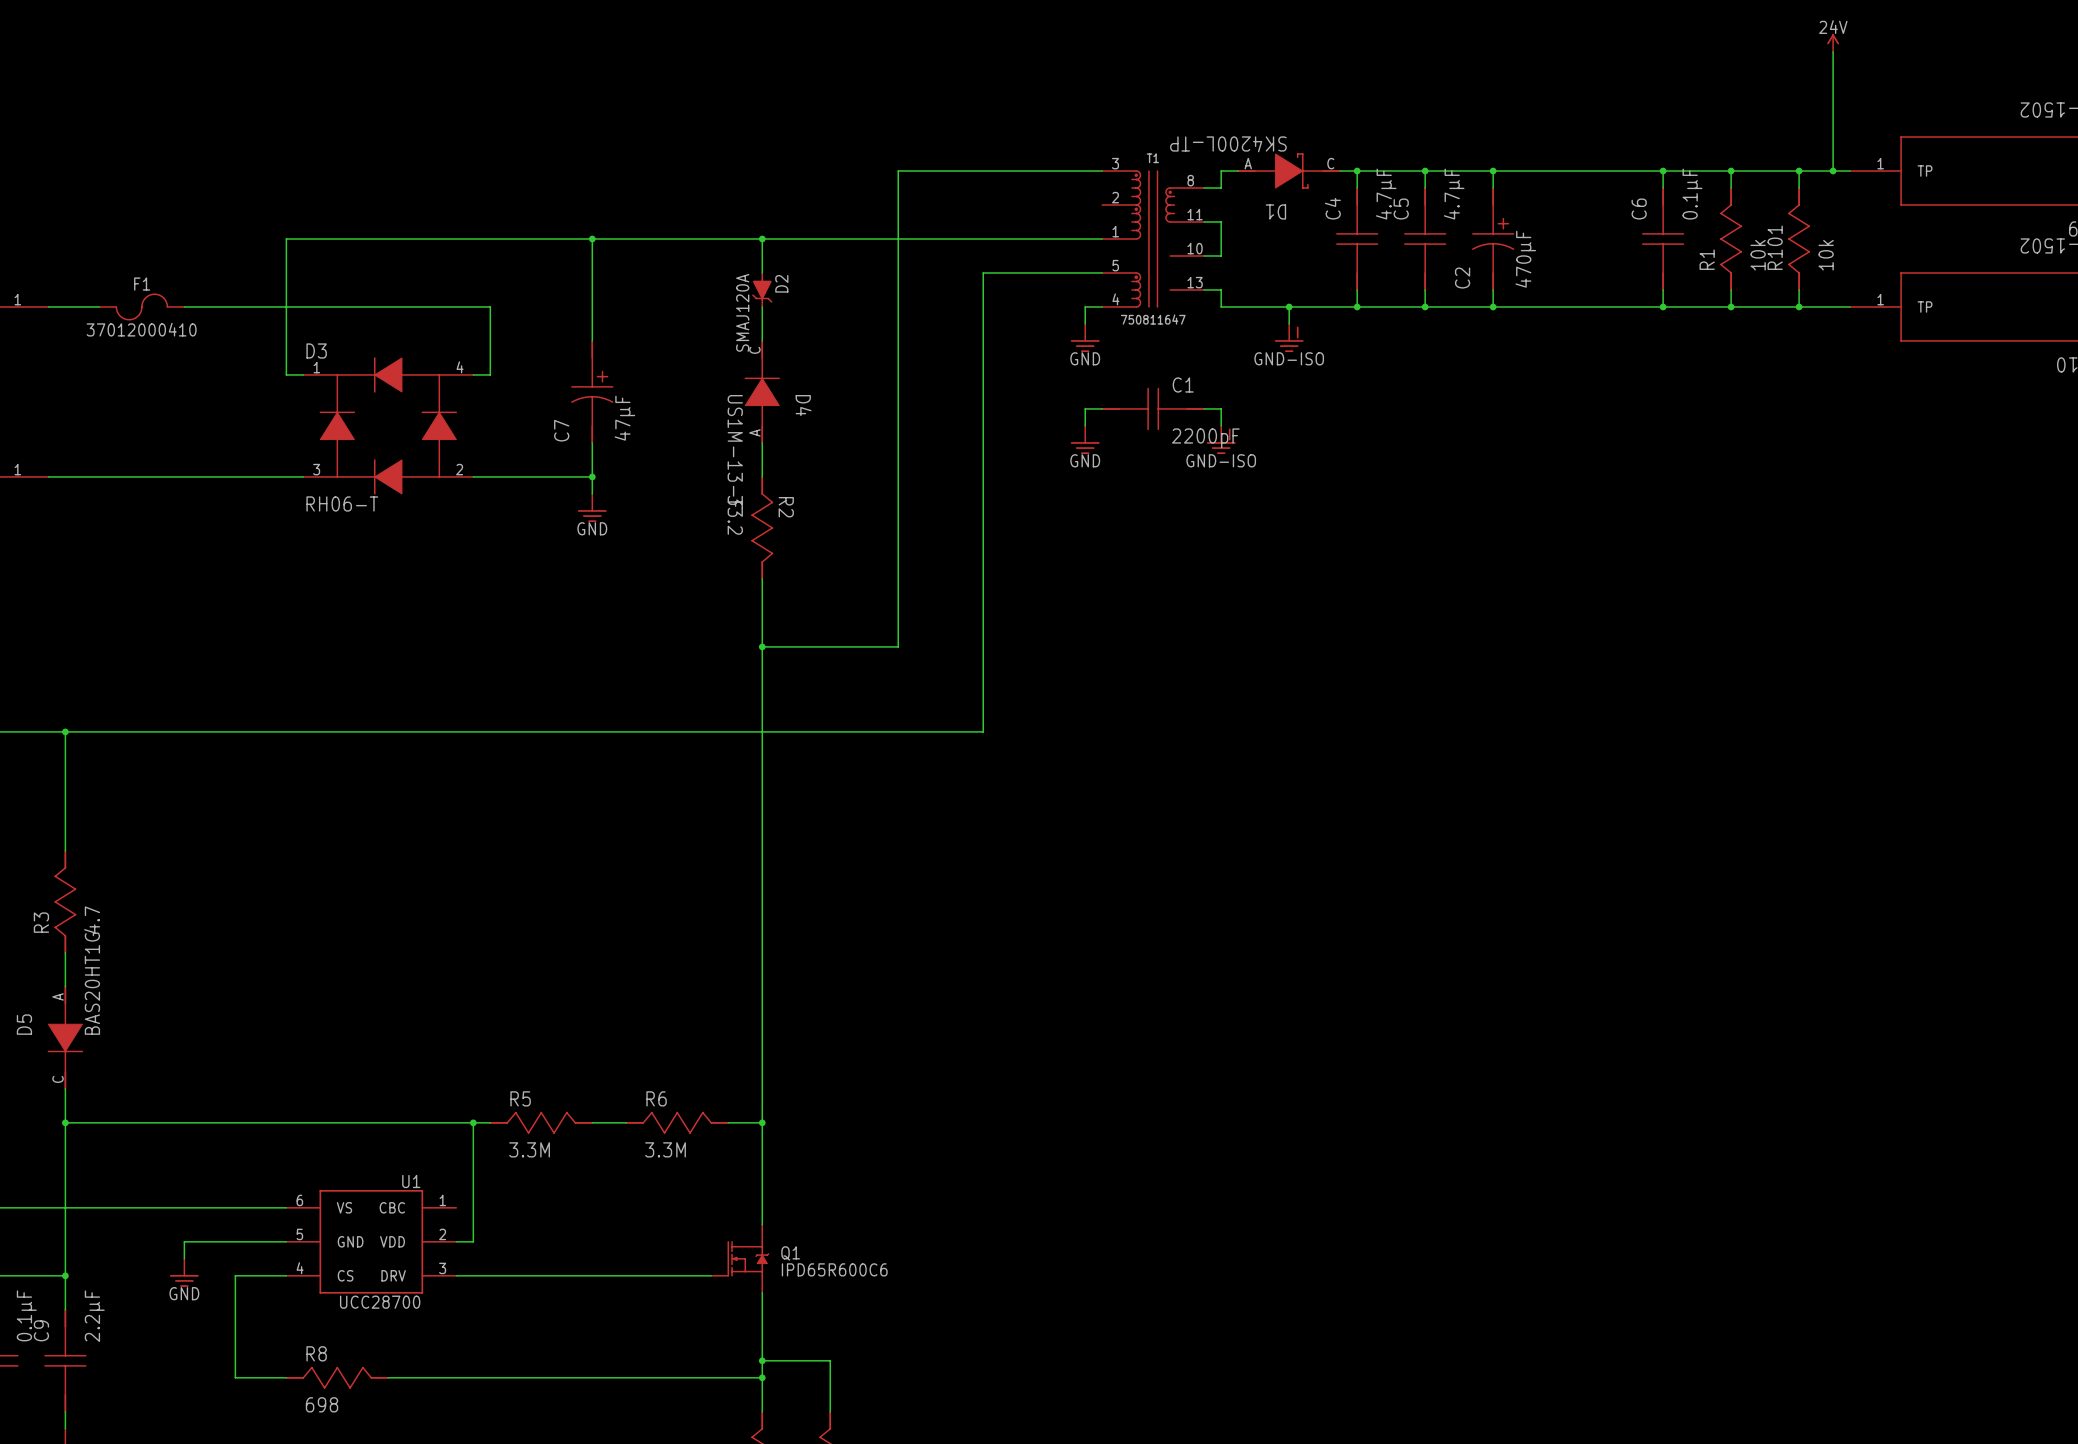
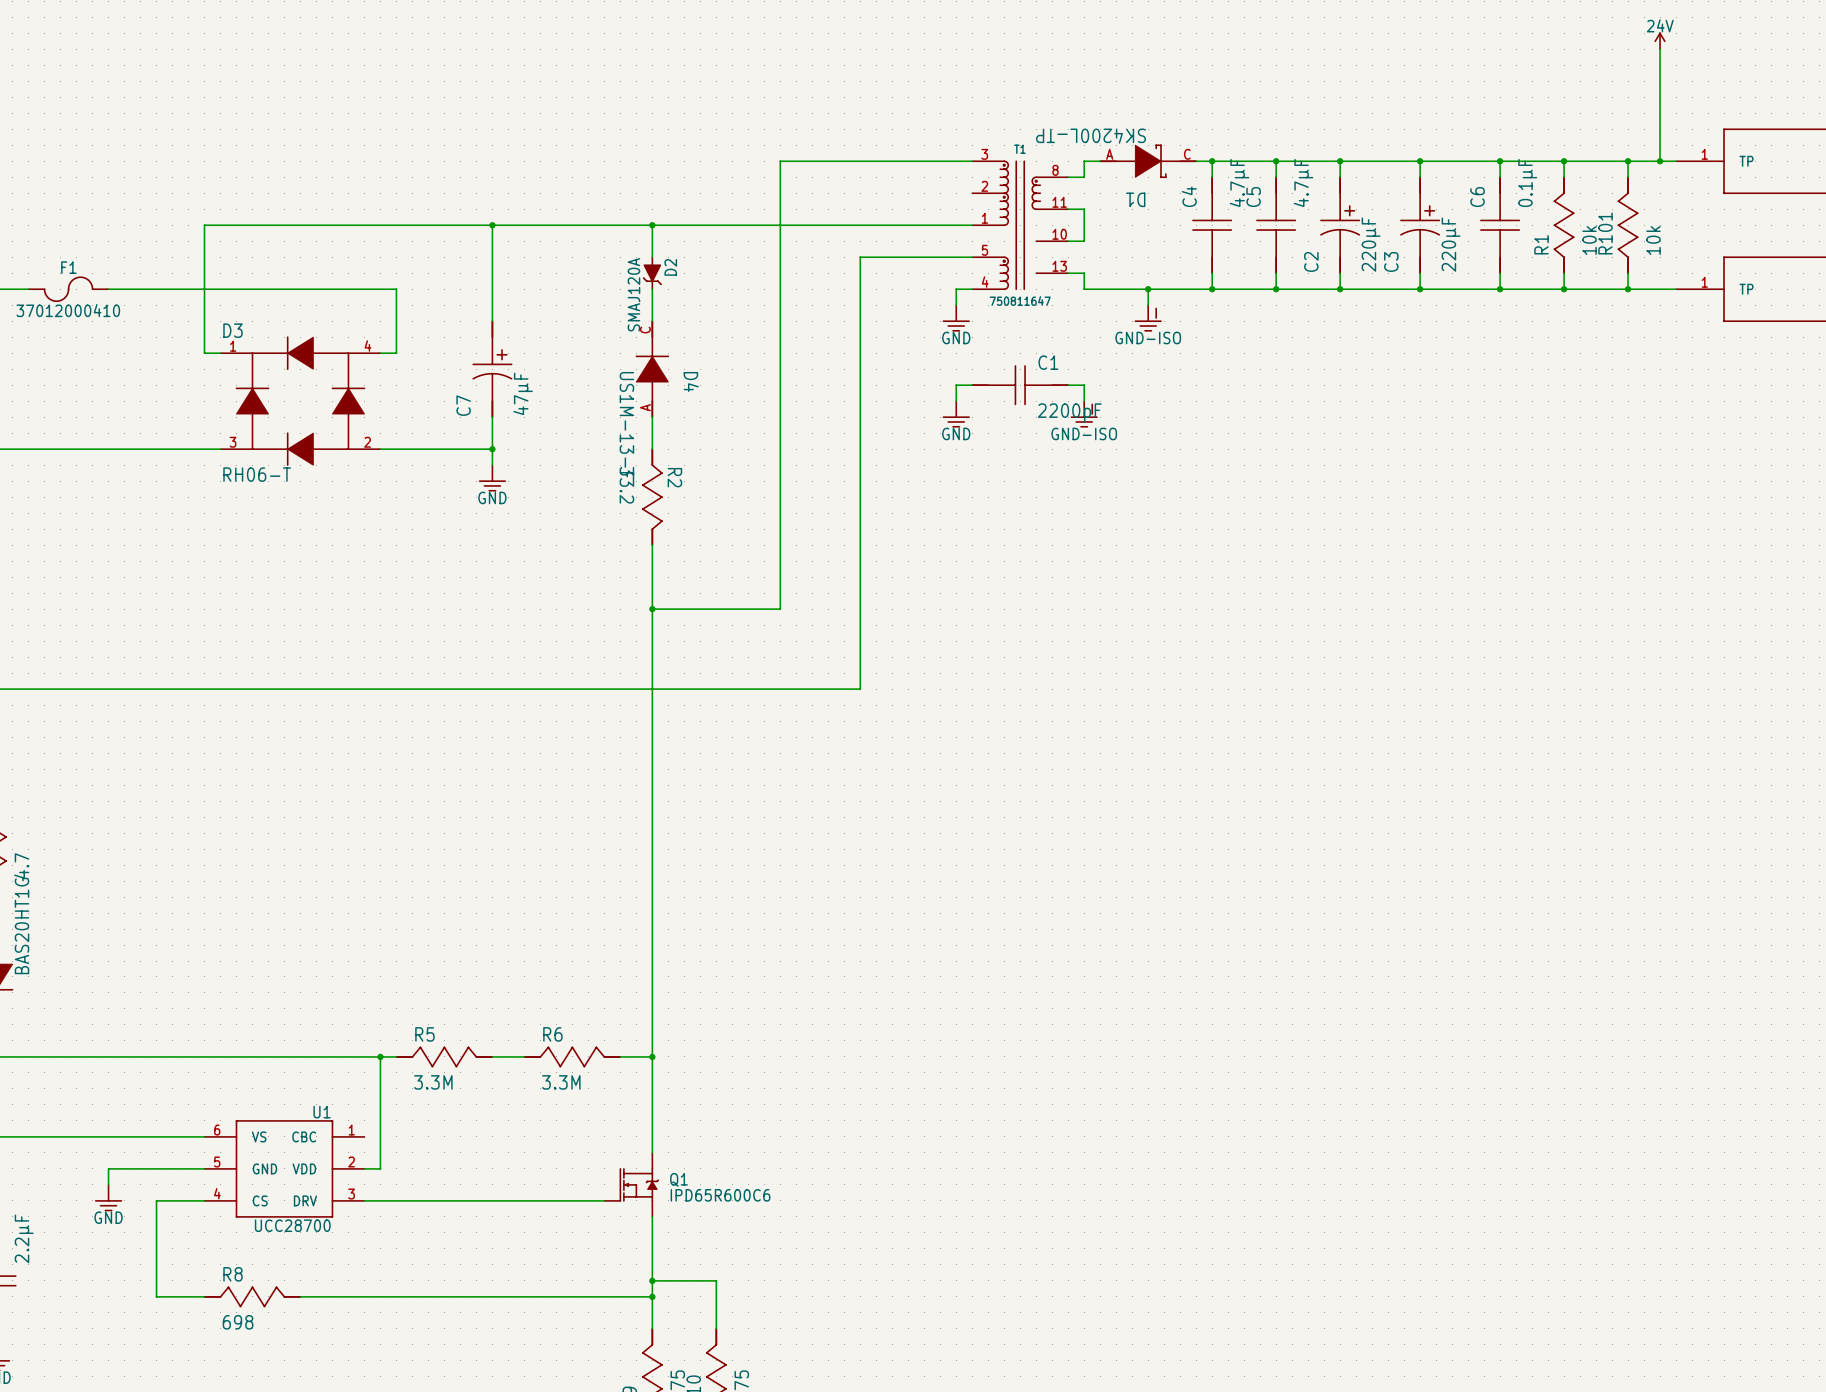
wire: none -> (1420, 161) (1420, 177)
junction: none -> (1420, 161)
C3: none -> 220µF (1420, 225)
C2 value: 470µF (1525, 259) -> 220µF (1371, 244)
wire: none -> (1420, 273) (1420, 289)
junction: none -> (1420, 289)

